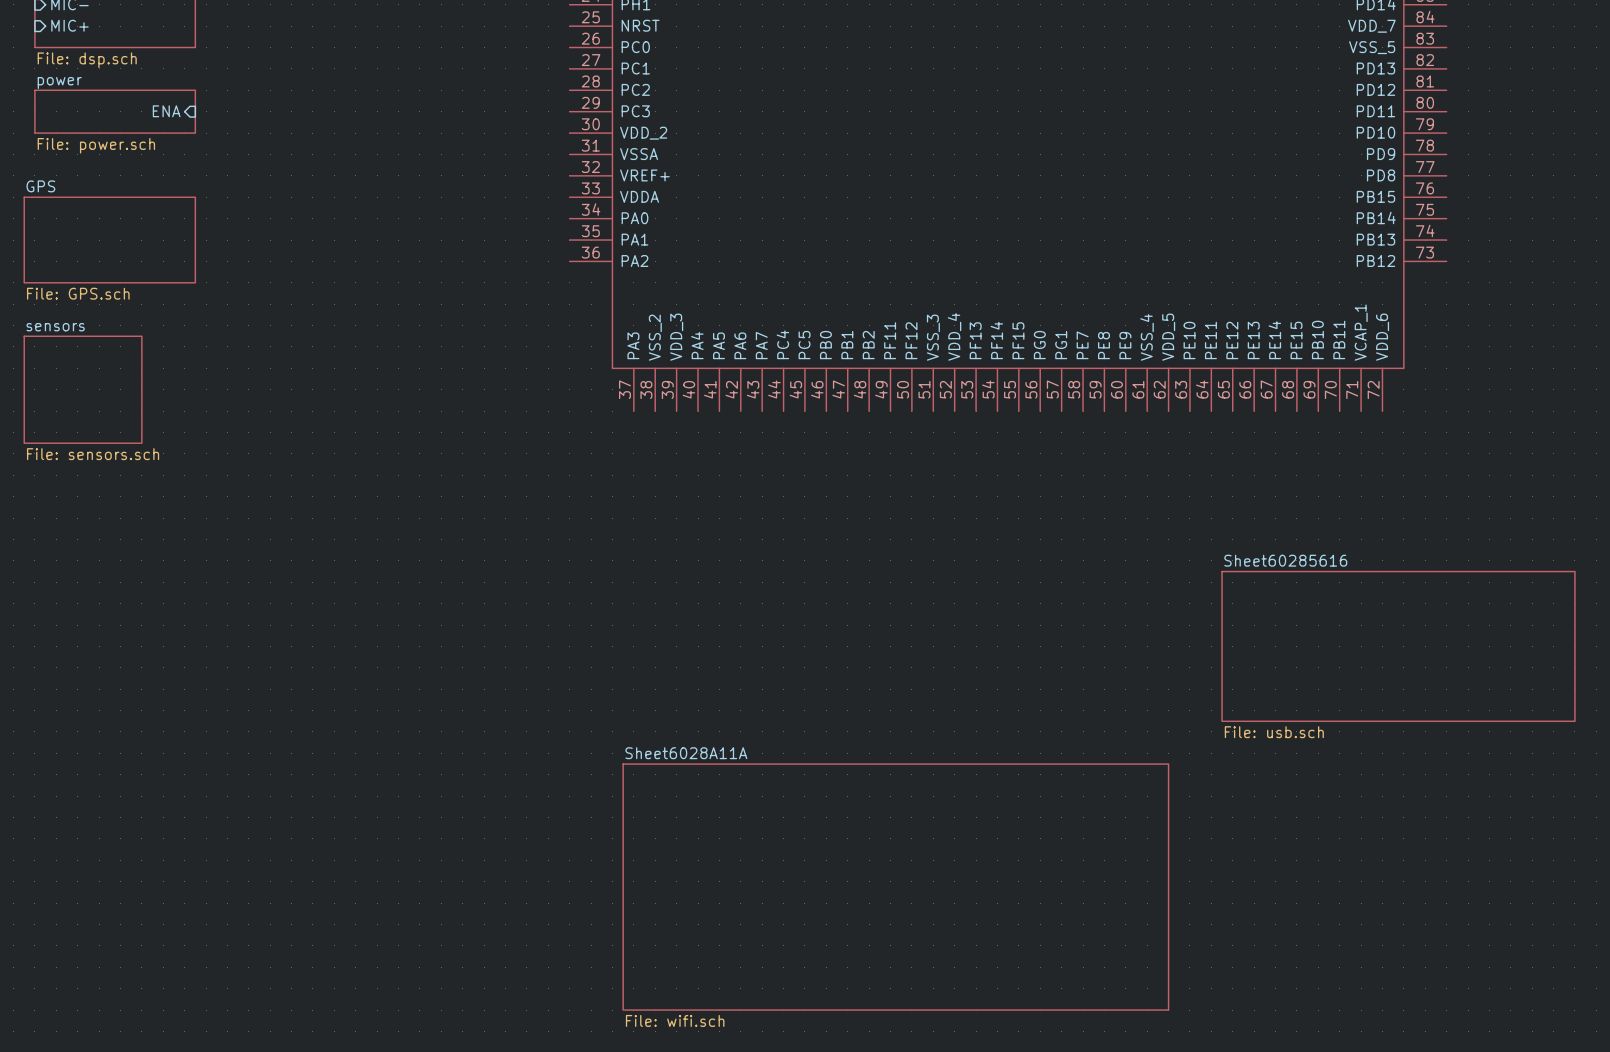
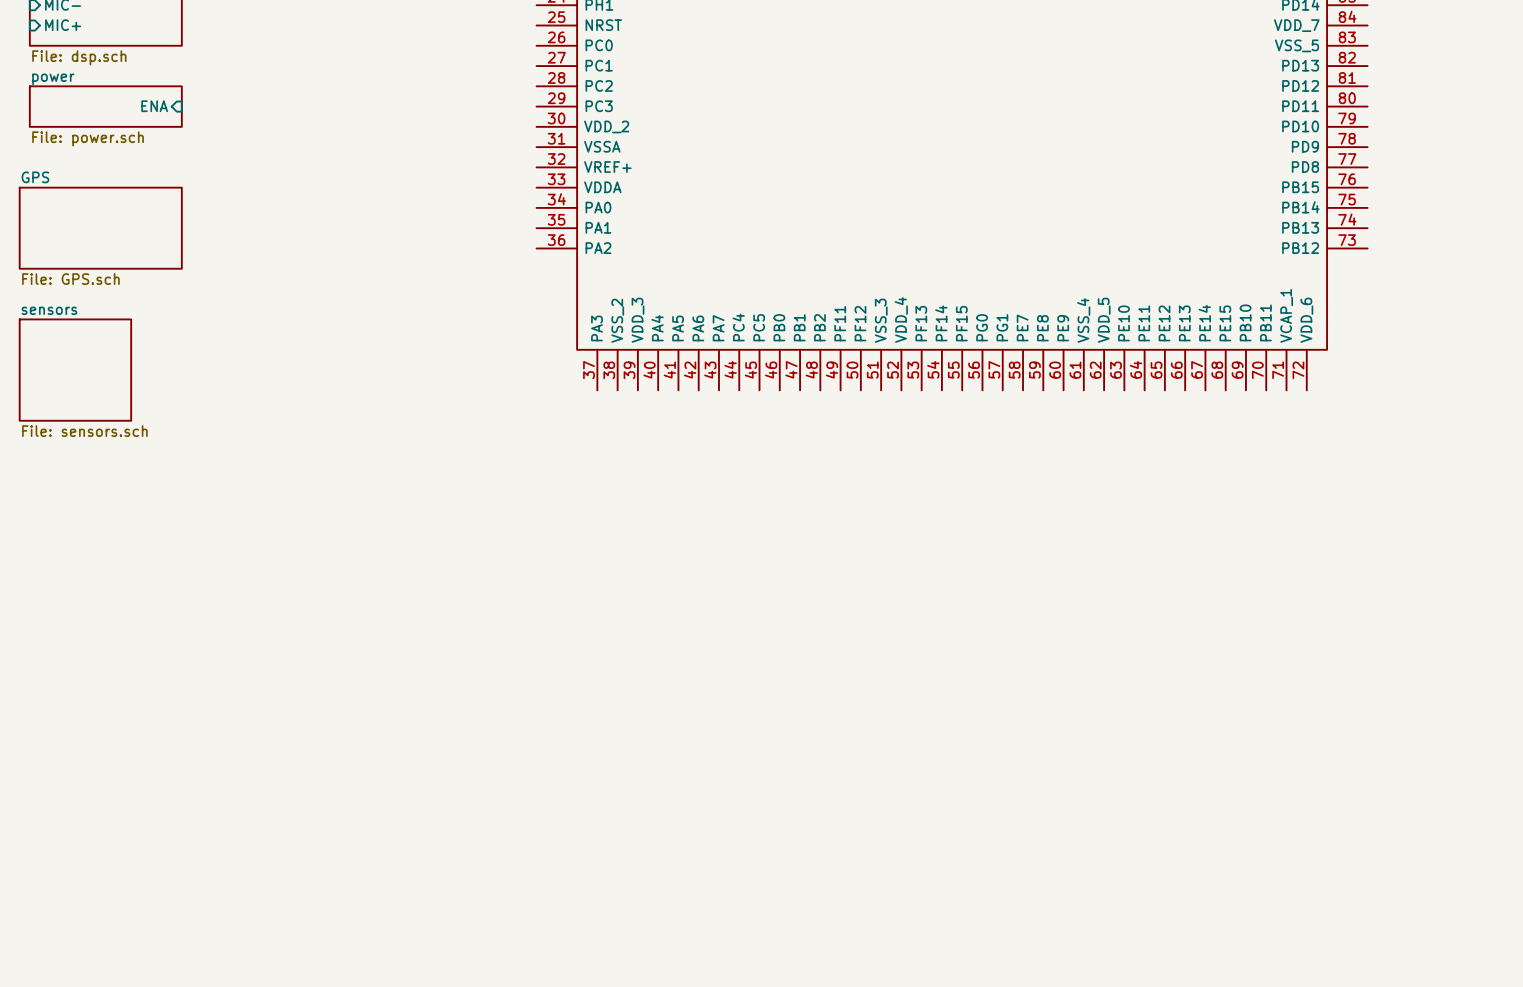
sheet Sheet60285616: File: usb.sch (1398, 646) -> none
sheet Sheet6028A11A: File: wifi.sch (895, 887) -> none

